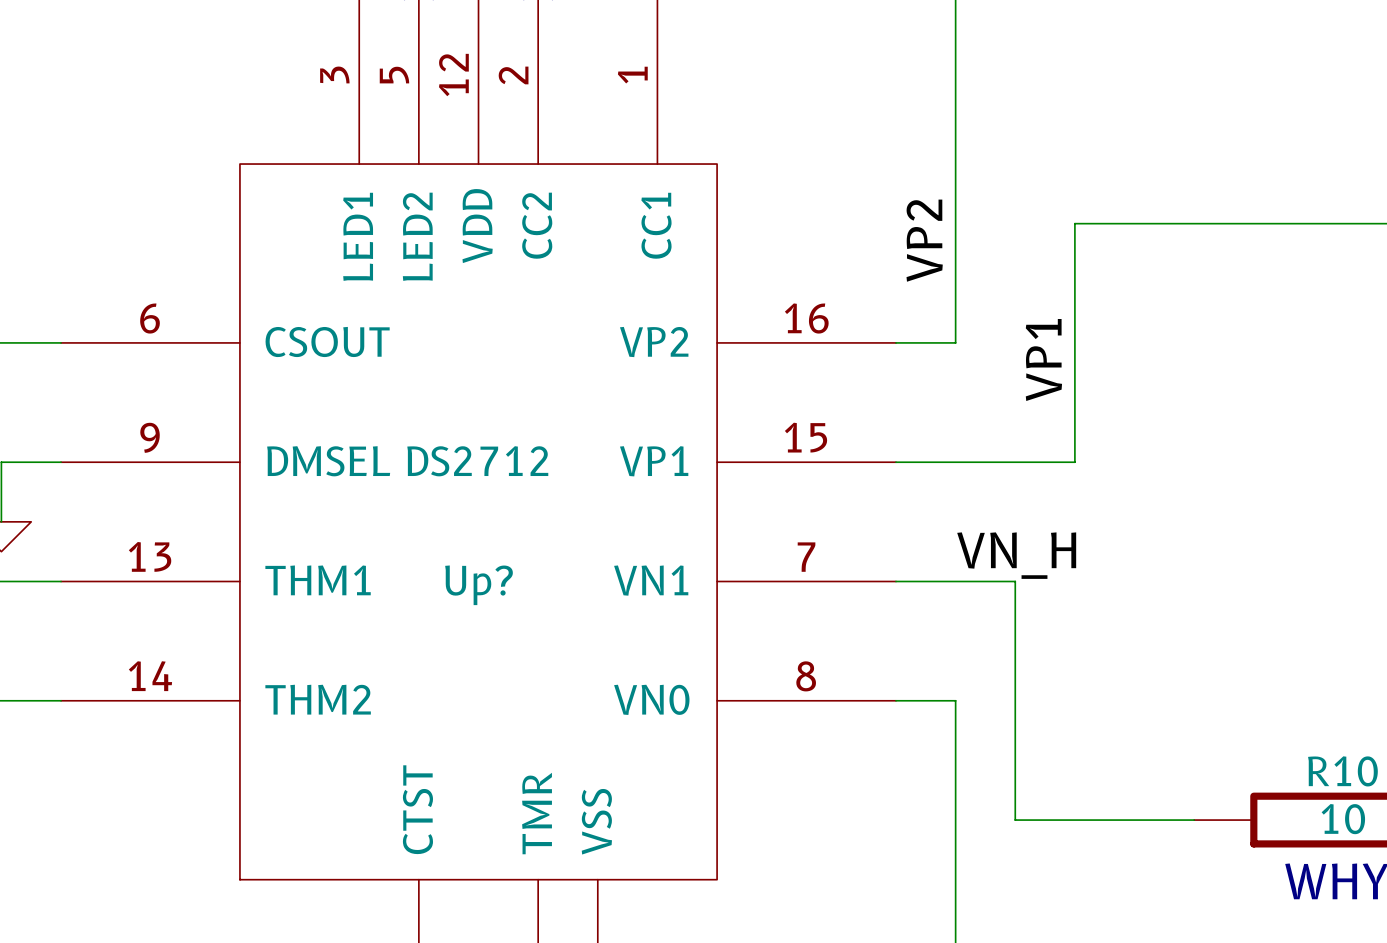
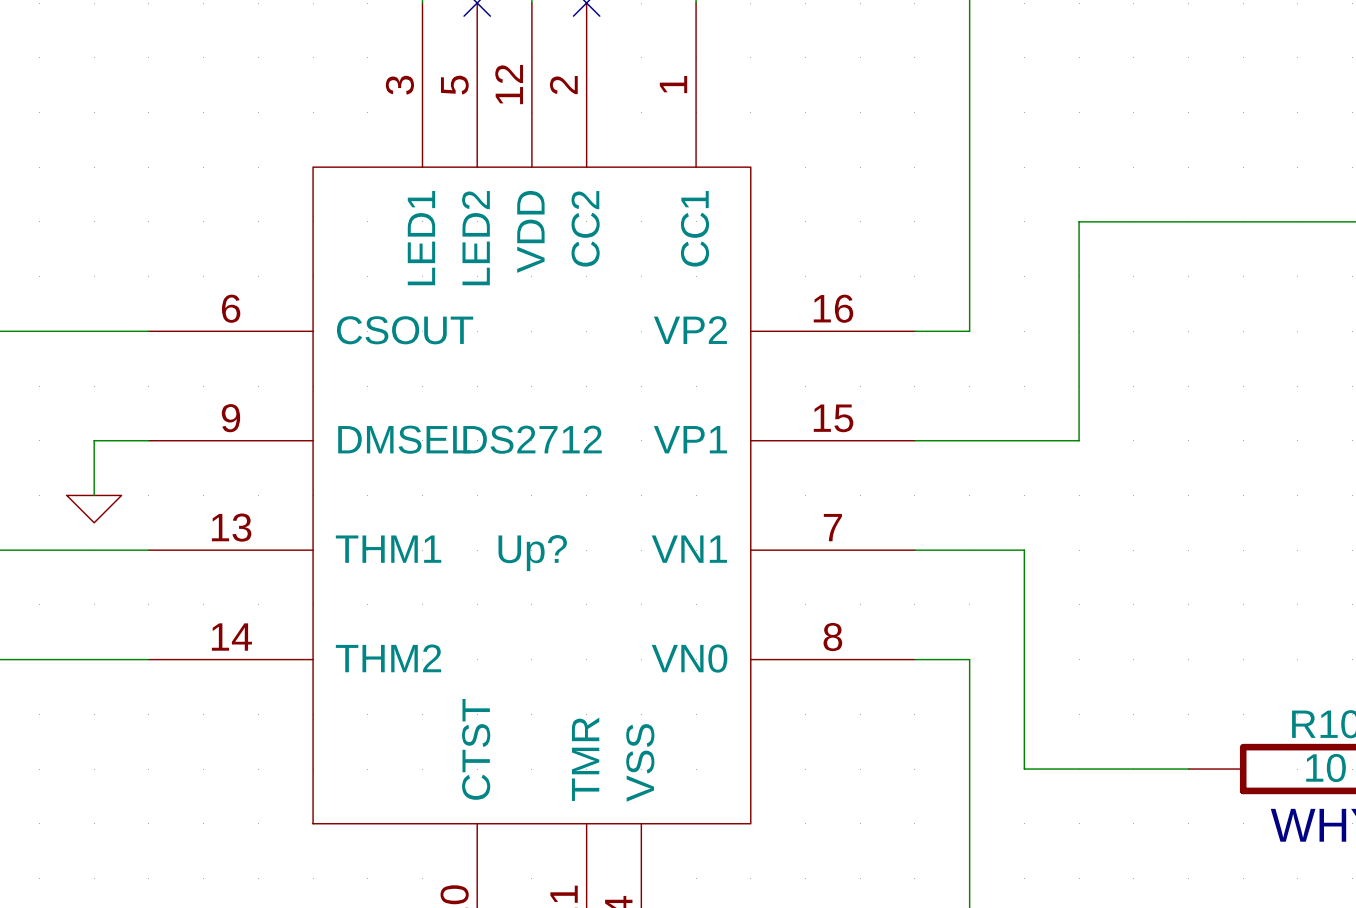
label: VP2 (924, 240) -> none
label: VP1 (1043, 360) -> none
label: VN_H (1016, 555) -> none

